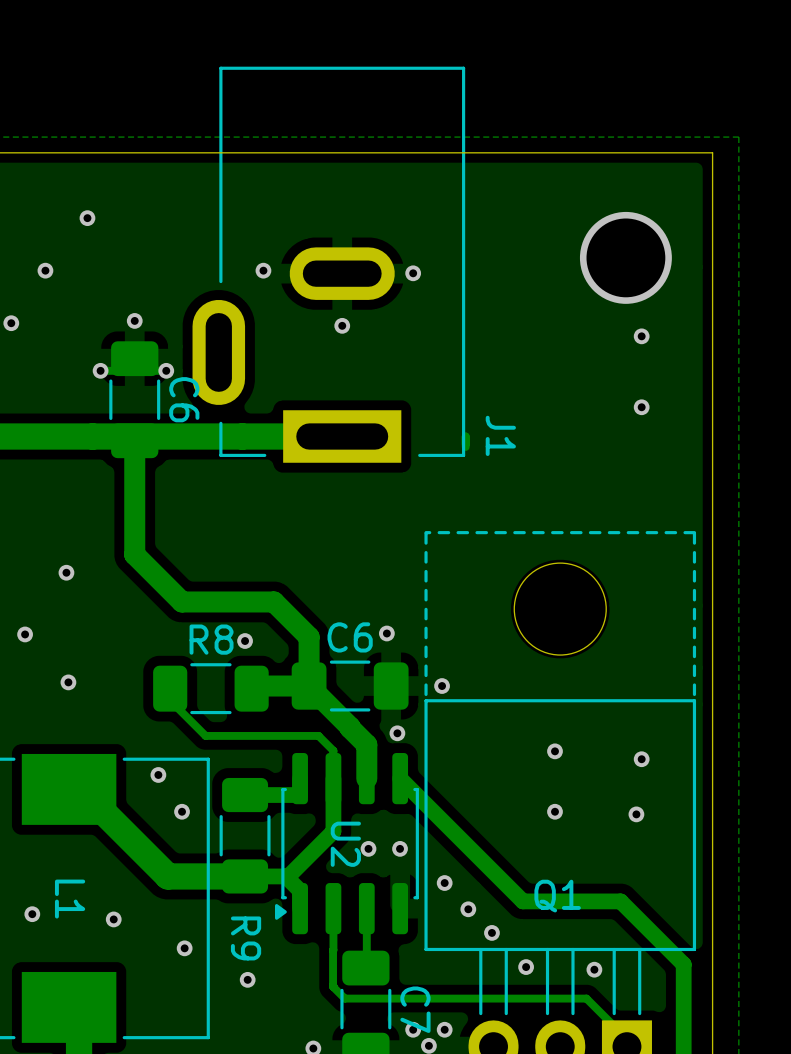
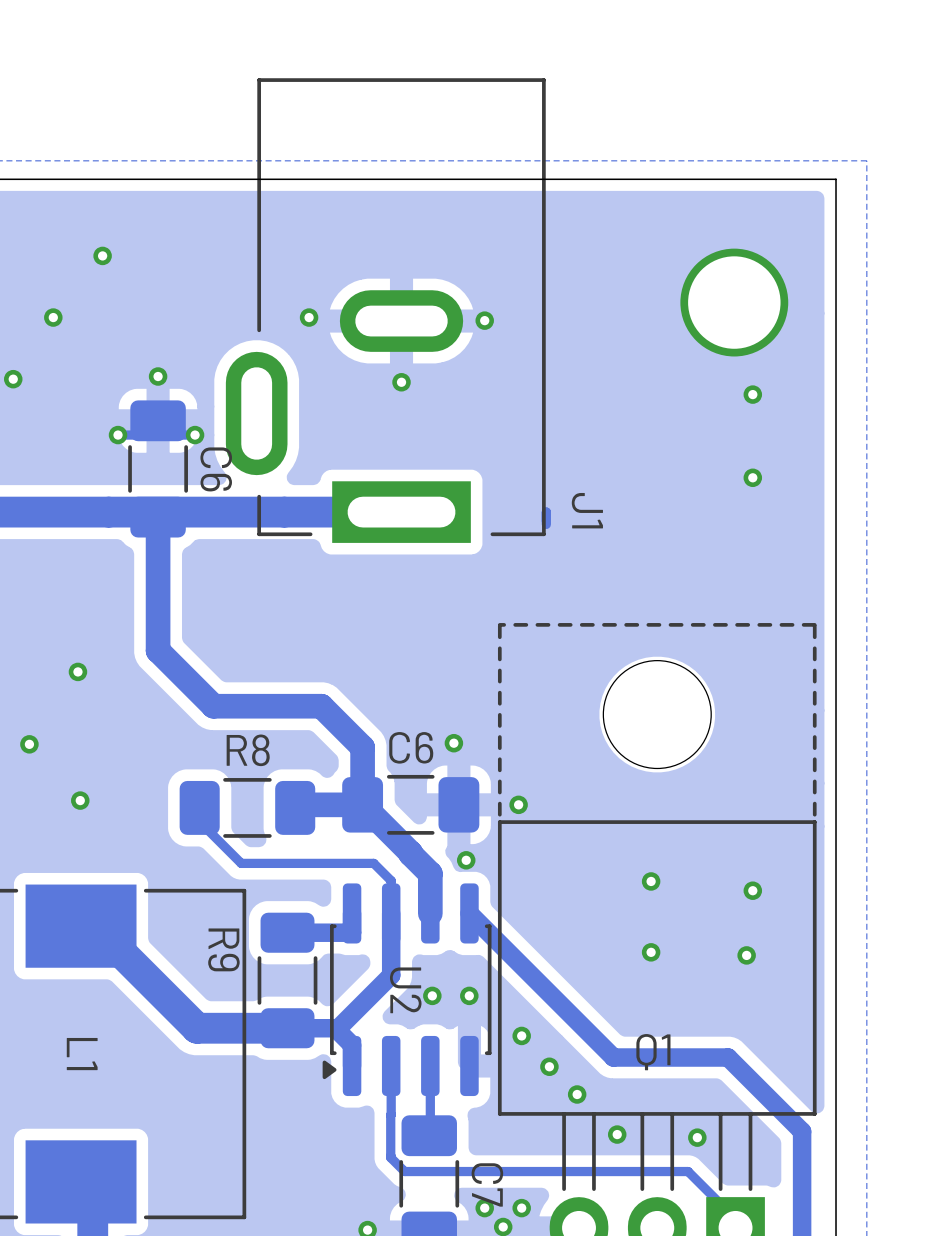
via: (245, 641) -> none
via: (158, 774) -> none
via: (182, 811) -> none
via: (32, 914) -> none
via: (113, 919) -> none
R9 name position: R9 (246, 938) -> R9 (223, 949)
via: (184, 948) -> none
via: (247, 979) -> none

